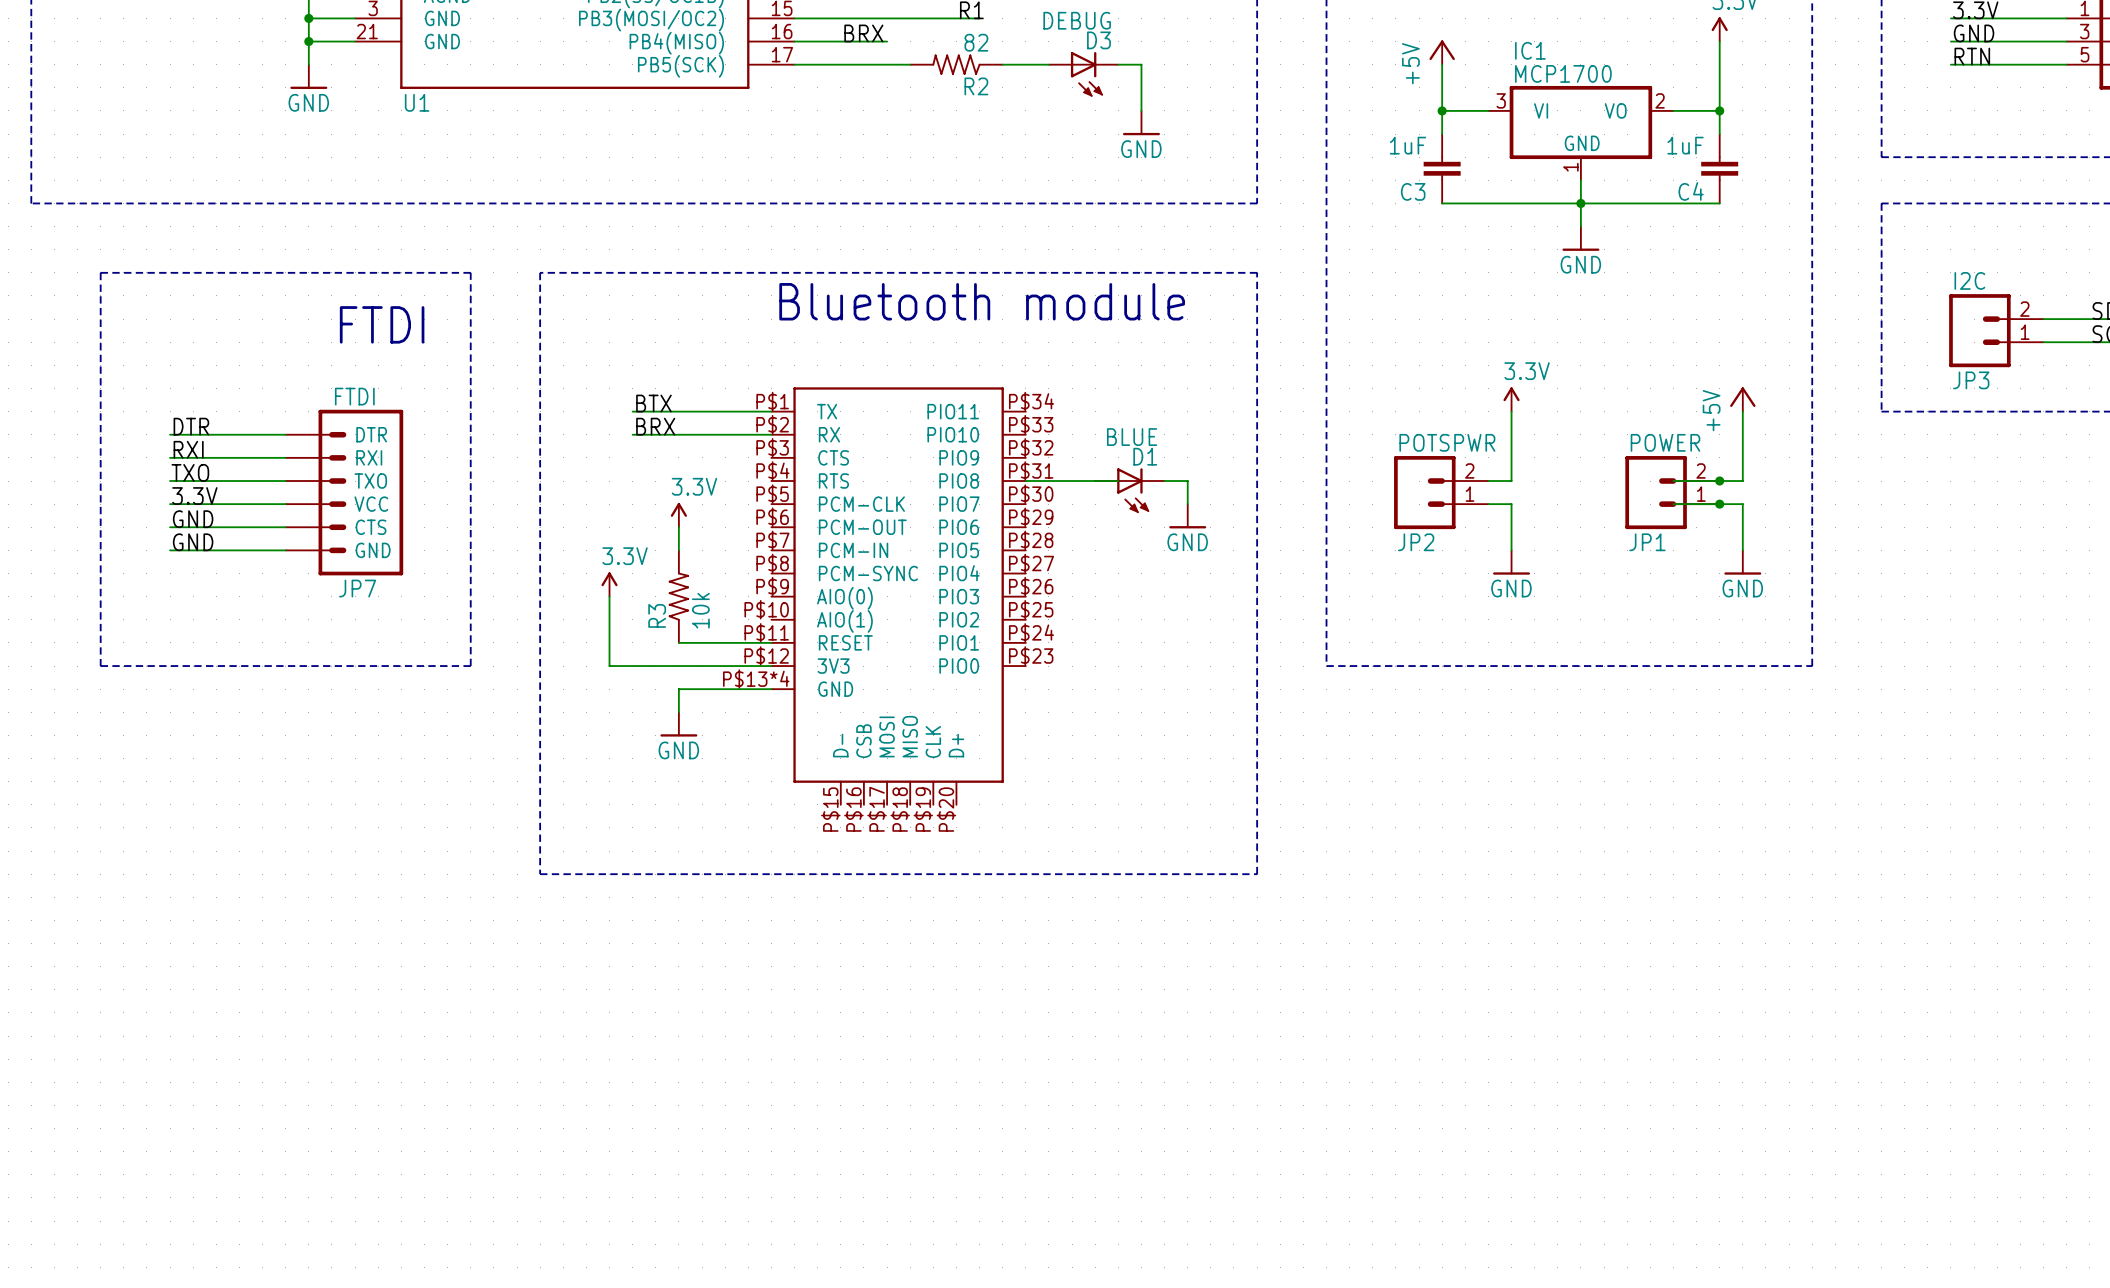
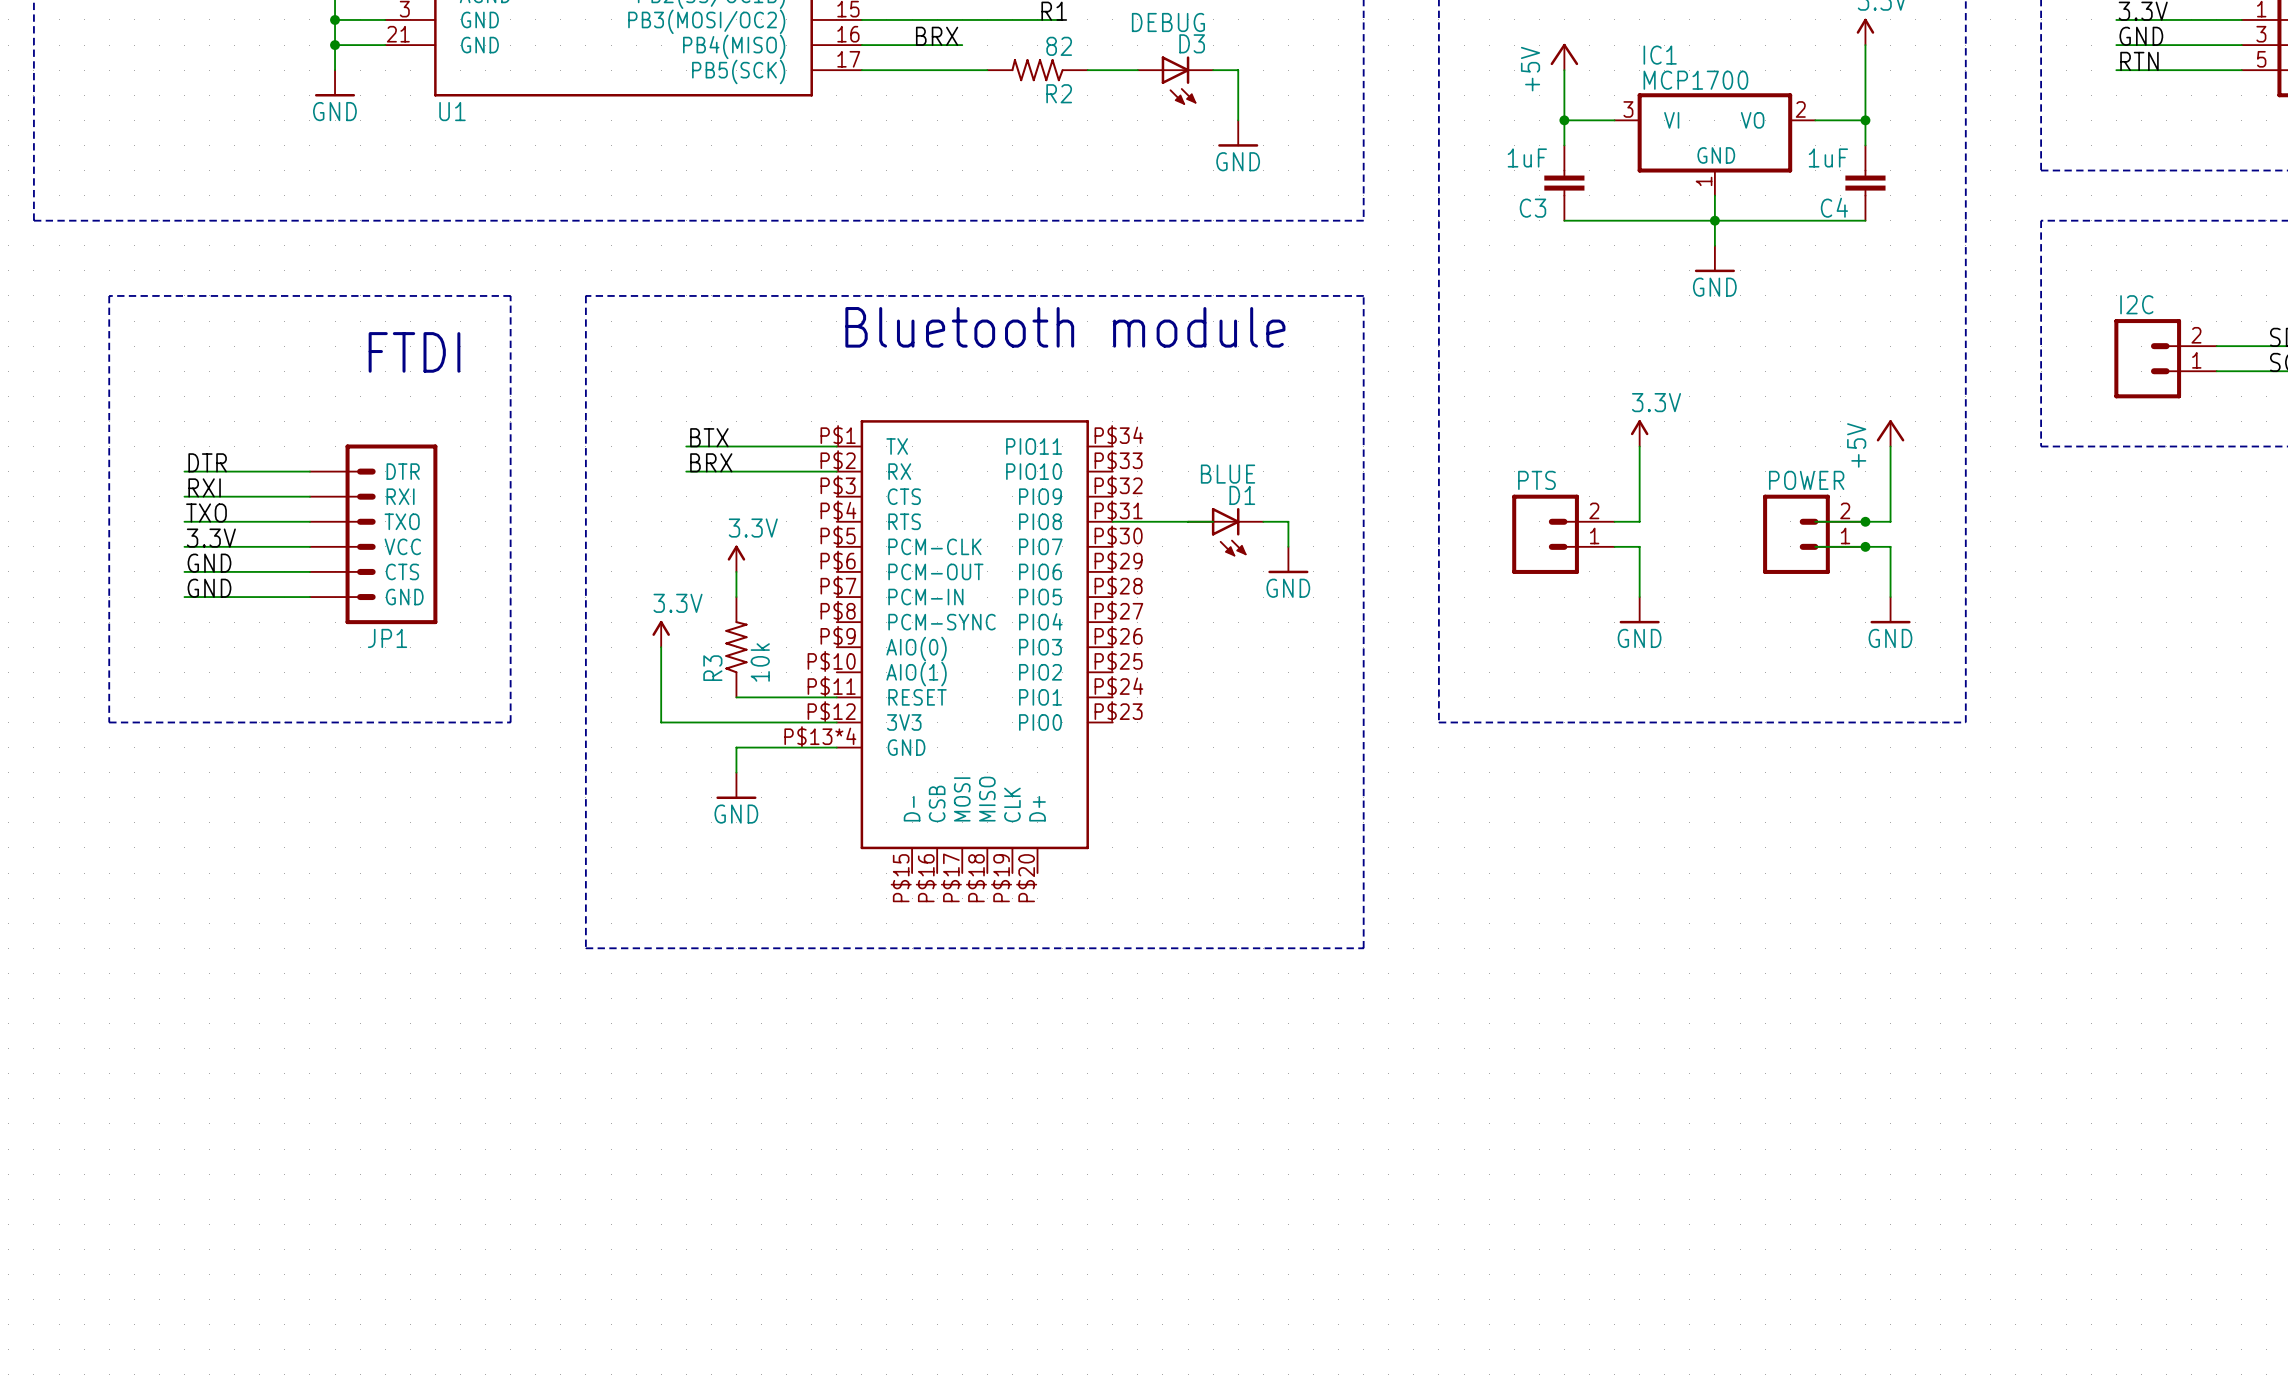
I2C value: JP3 (1971, 380) -> none
JP7 value: FTDI (354, 396) -> none
POTSPWR name: POTSPWR (1447, 442) -> PTS (1536, 480)
POTSPWR value: JP2 (1416, 542) -> none
POWER value: JP1 (1647, 542) -> none
JP7 name: JP7 (357, 588) -> JP1 (387, 638)

